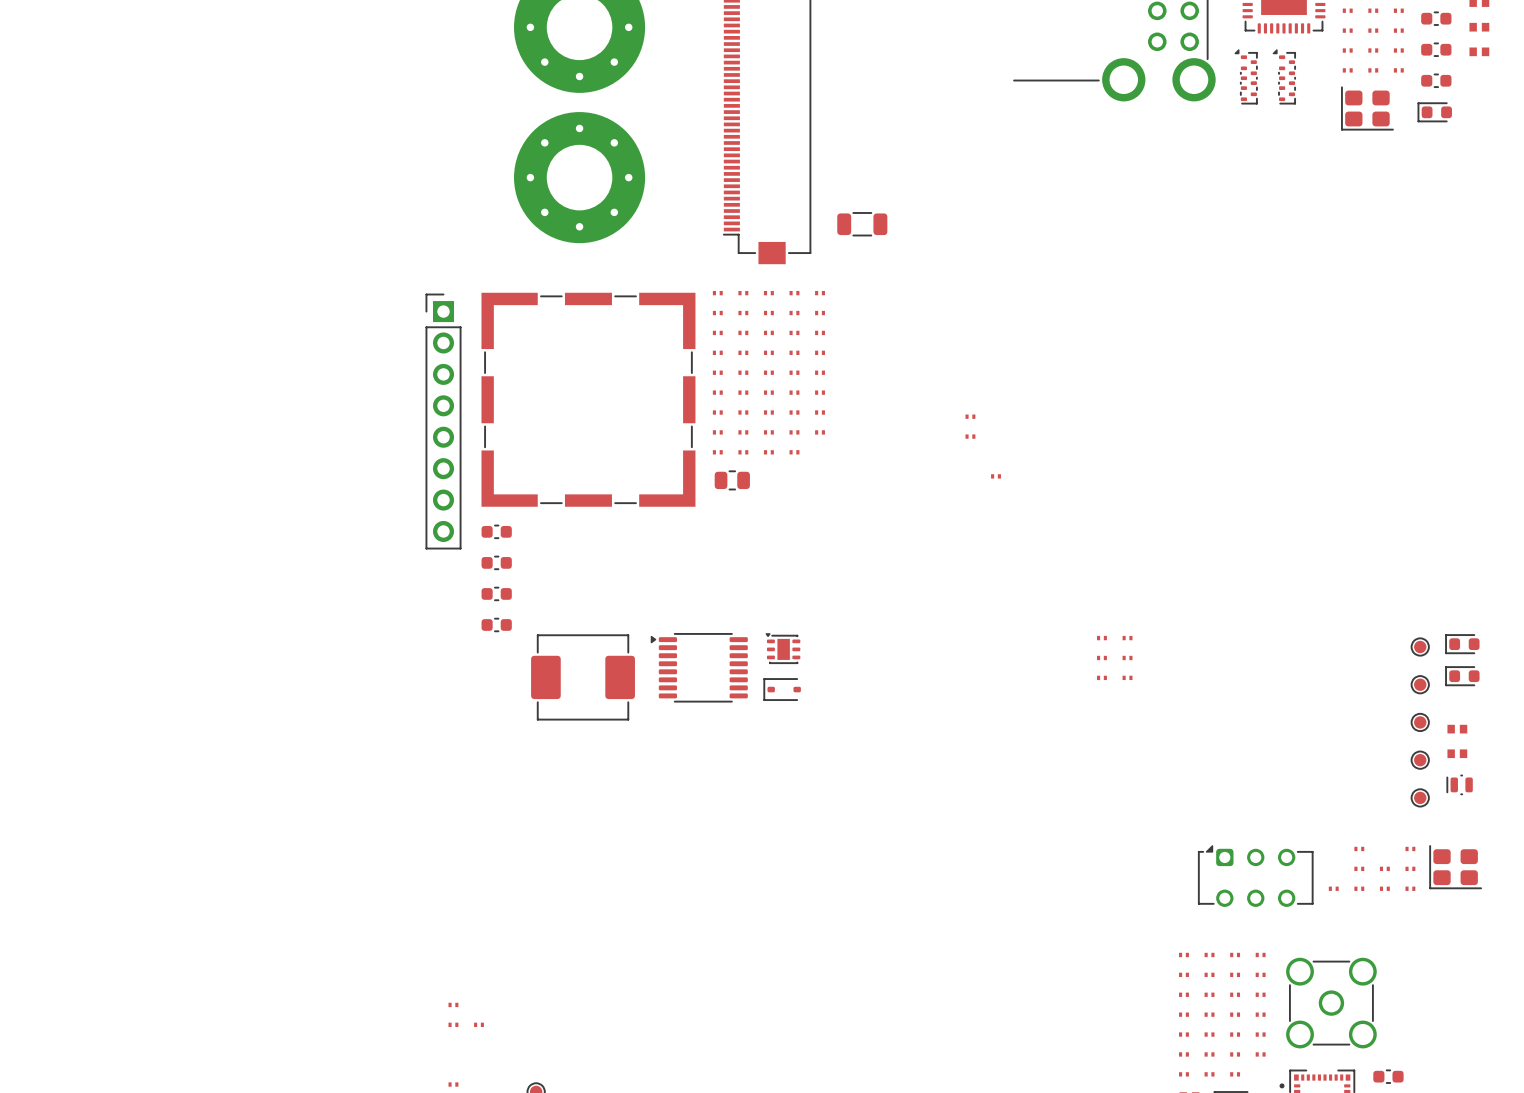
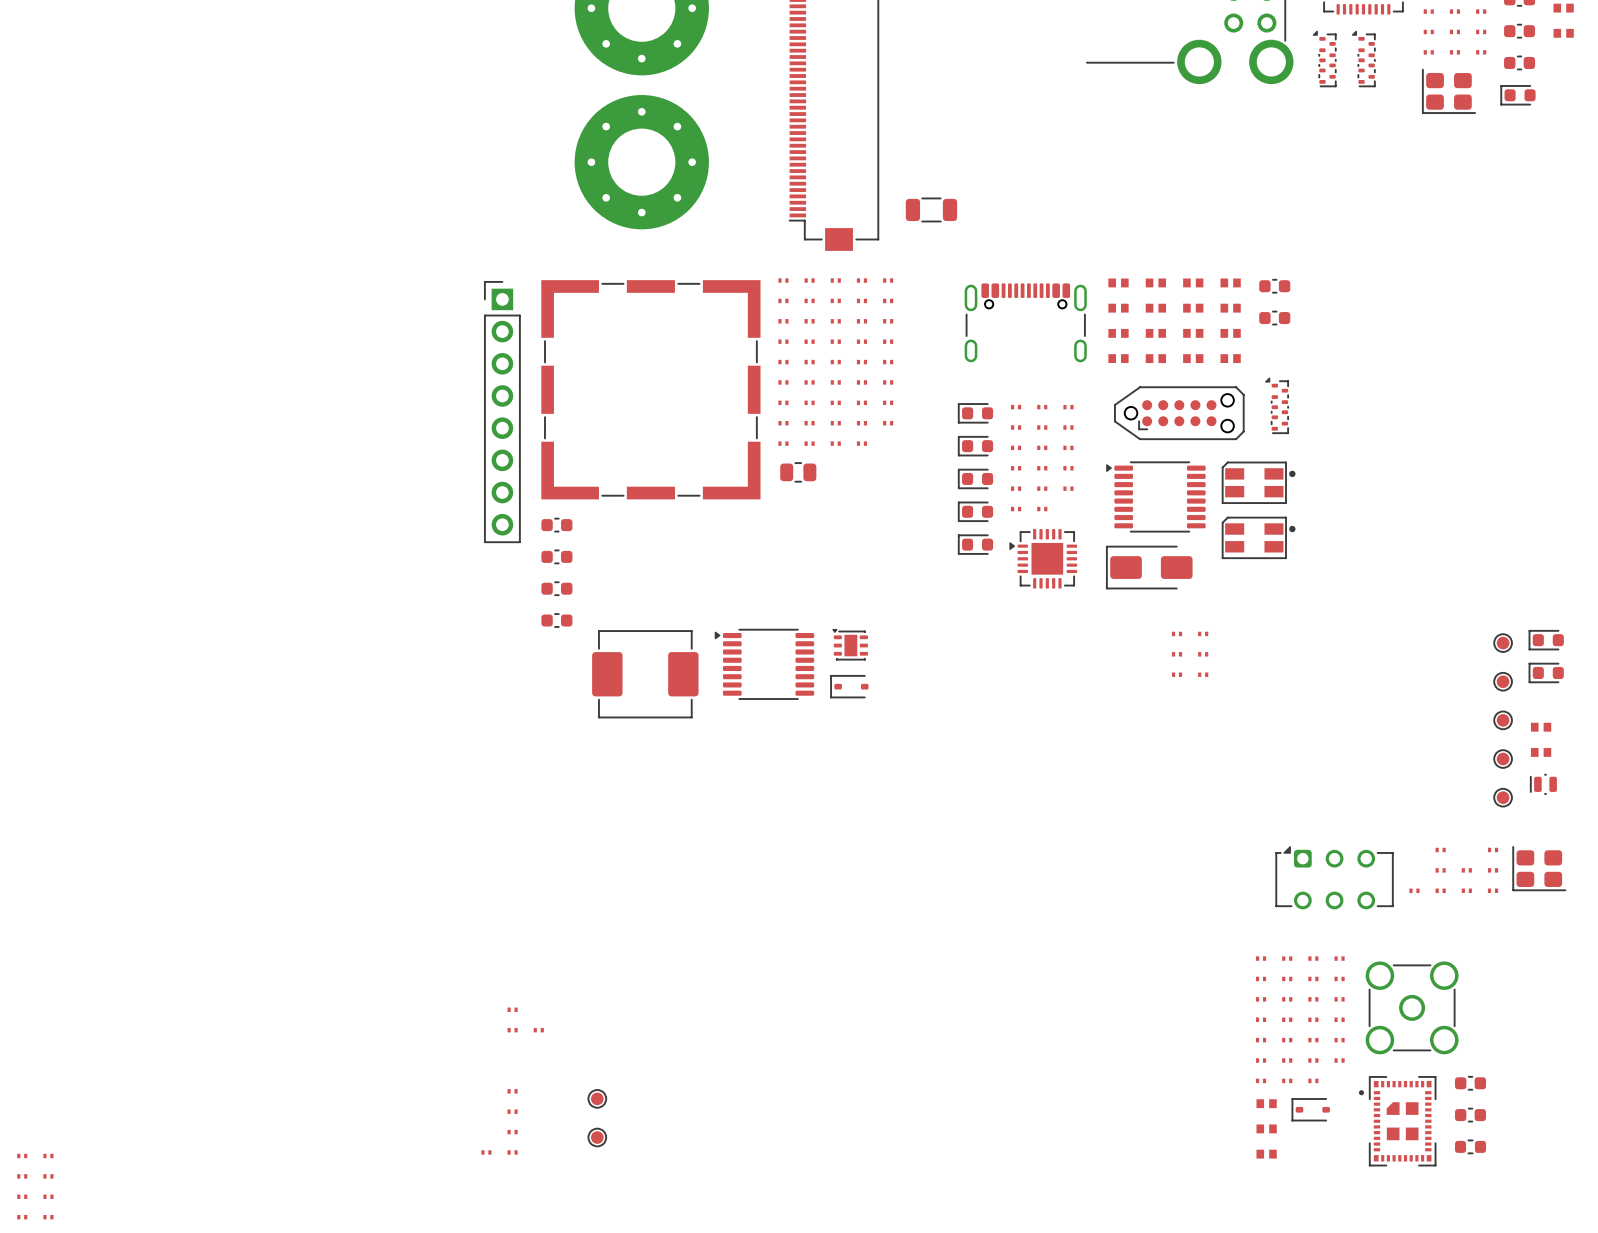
part: none -> (1118, 282)
part: none -> (1155, 282)
part: none -> (1193, 282)
part: none -> (1230, 282)
part: none -> (1274, 286)
part: none -> (1118, 308)
part: none -> (1155, 308)
part: none -> (1193, 308)
part: none -> (1230, 308)
part: none -> (1274, 318)
part: none -> (1025, 322)
part: none -> (1118, 333)
part: none -> (1155, 333)
part: none -> (1193, 333)
part: none -> (1230, 333)
part: none -> (1118, 358)
part: none -> (1155, 358)
part: none -> (1193, 358)
part: none -> (1230, 358)
part: none -> (1277, 405)
part: none -> (1016, 407)
part: none -> (1068, 407)
part: none -> (975, 413)
part: none -> (1179, 413)
part: none -> (1016, 427)
part: none -> (1068, 427)
part: none -> (975, 446)
part: none -> (1016, 447)
part: none -> (1042, 447)
part: none -> (1068, 447)
part: none -> (1016, 468)
part: none -> (1042, 468)
part: none -> (975, 478)
part: none -> (1258, 482)
part: none -> (1016, 488)
part: none -> (1042, 488)
part: none -> (1068, 488)
part: none -> (1155, 496)
part: none -> (1016, 509)
part: none -> (1042, 509)
part: none -> (975, 511)
part: none -> (1258, 537)
part: none -> (975, 544)
part: none -> (1043, 558)
part: none -> (1149, 567)

